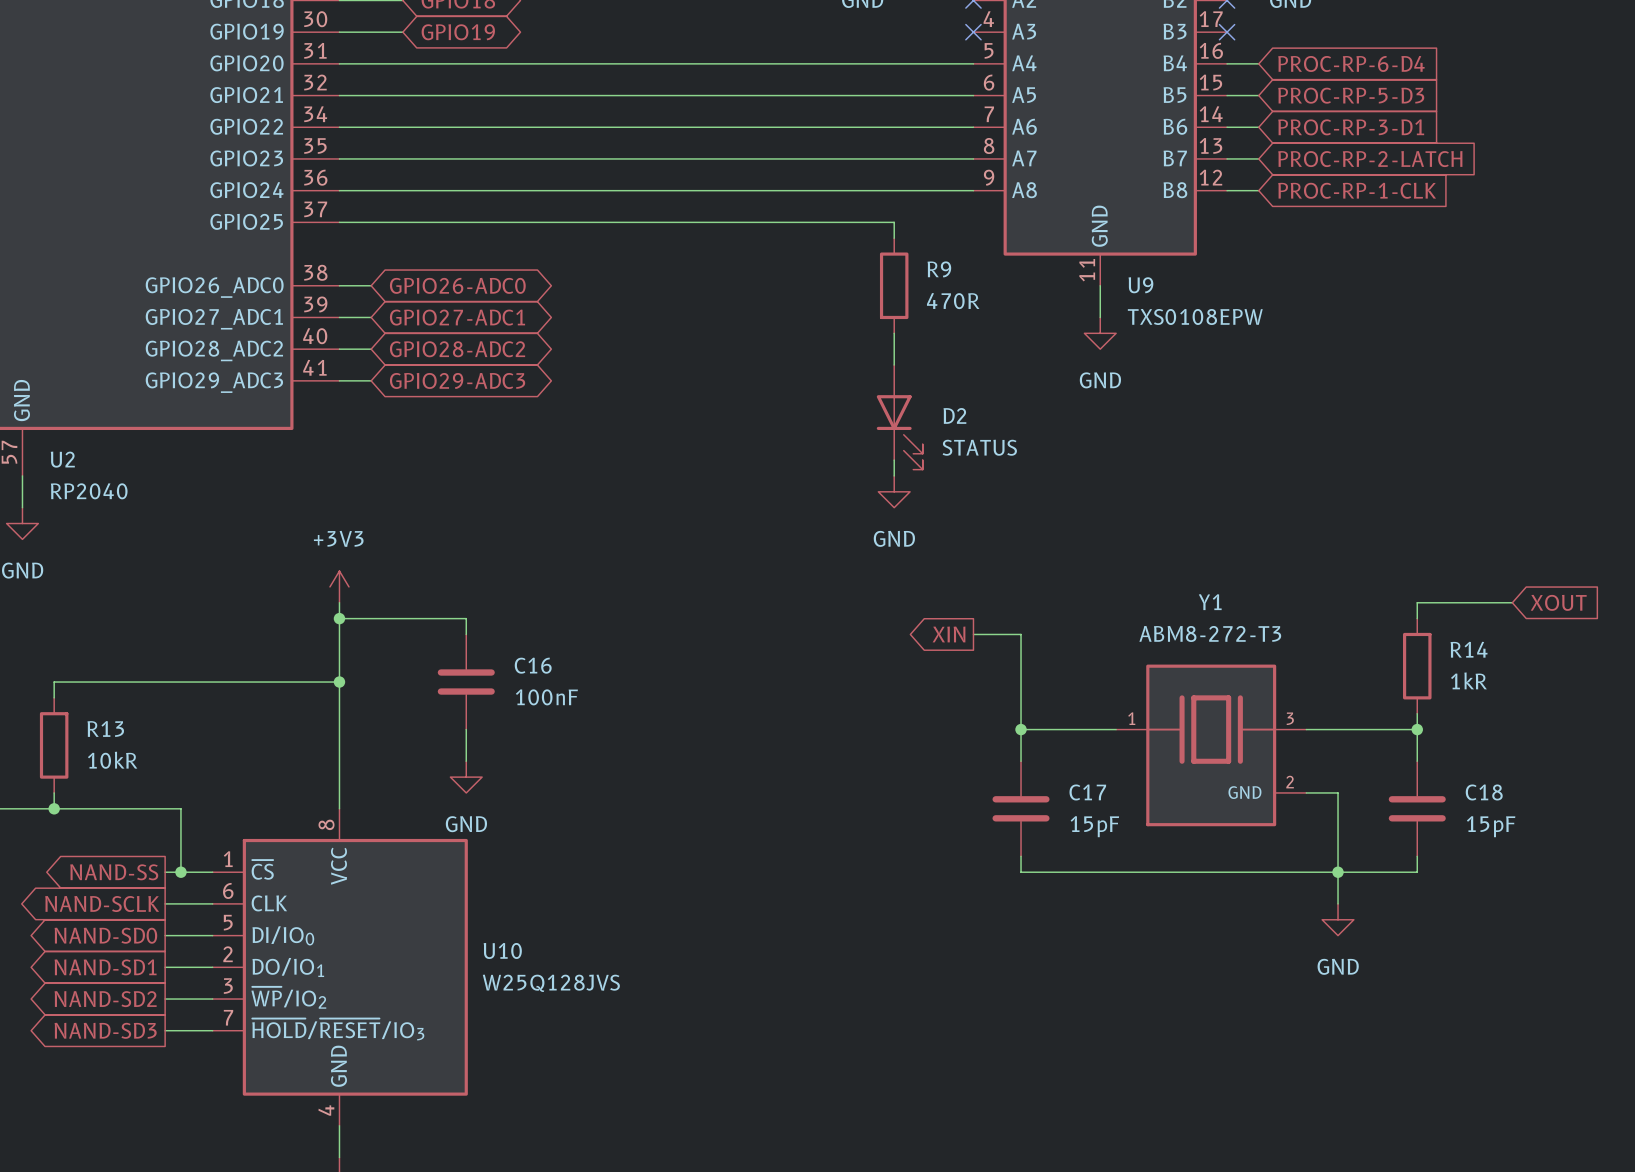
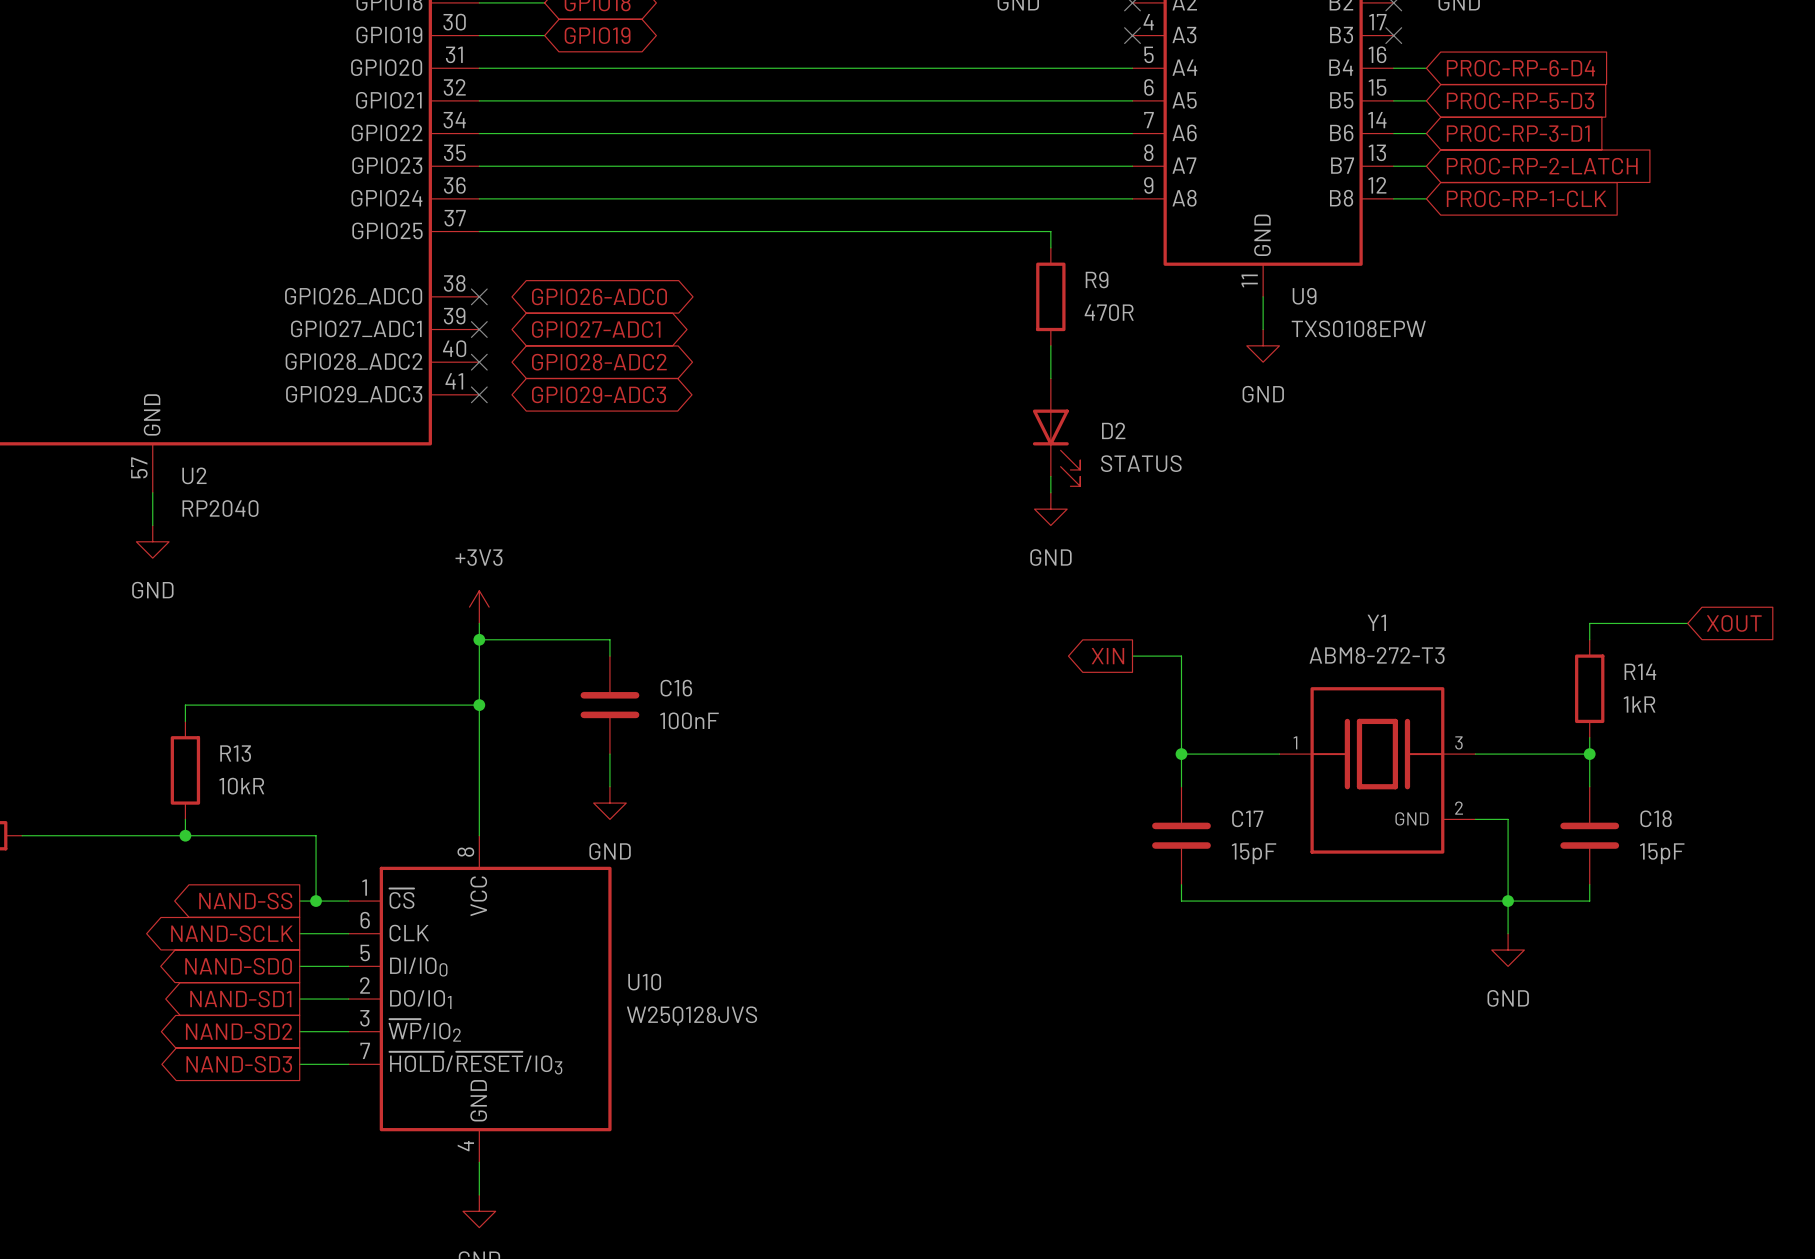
wire: (339, 285) (371, 285) -> none
no-connect mark: none -> (479, 296)
wire: (339, 317) (371, 317) -> none
no-connect mark: none -> (479, 329)
wire: (339, 349) (371, 349) -> none
no-connect mark: none -> (479, 362)
wire: (339, 380) (371, 380) -> none
no-connect mark: none -> (479, 394)

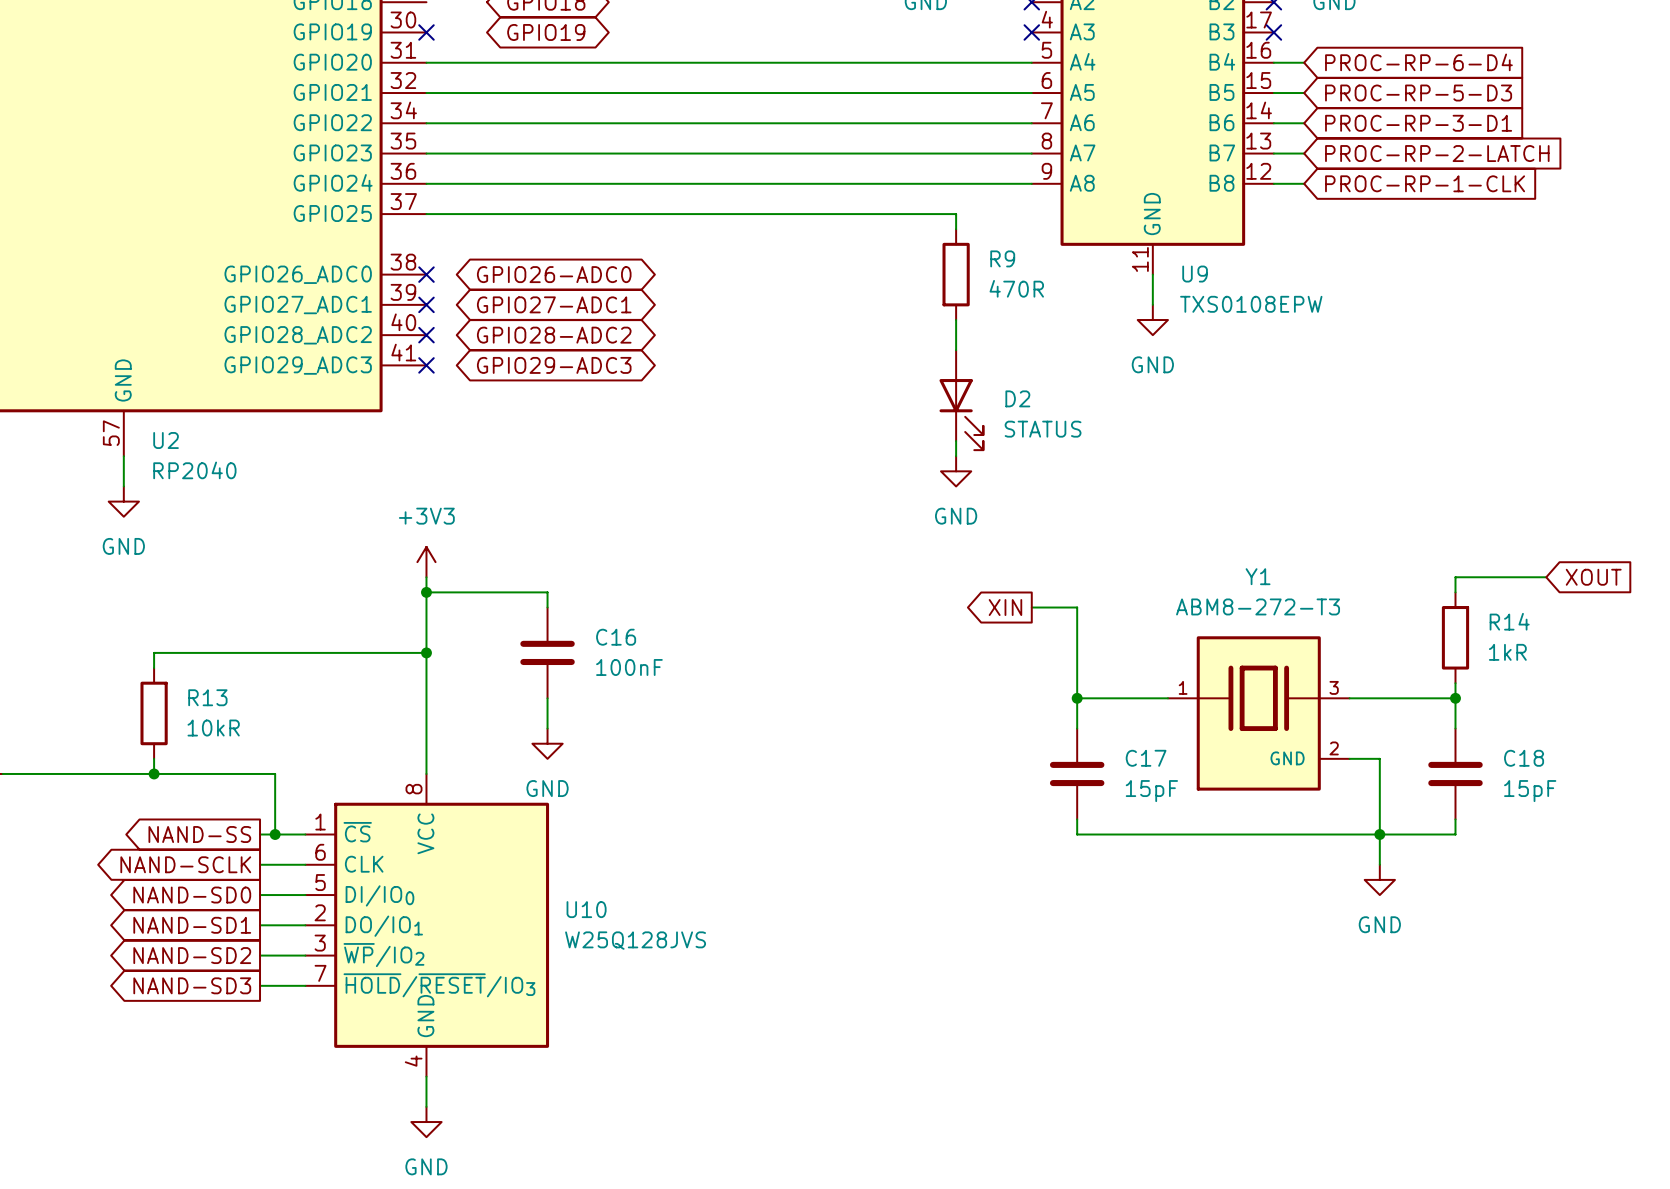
wire: (479, 2) (544, 2) -> none
wire: (479, 35) (544, 35) -> none
no-connect mark: none -> (426, 32)

